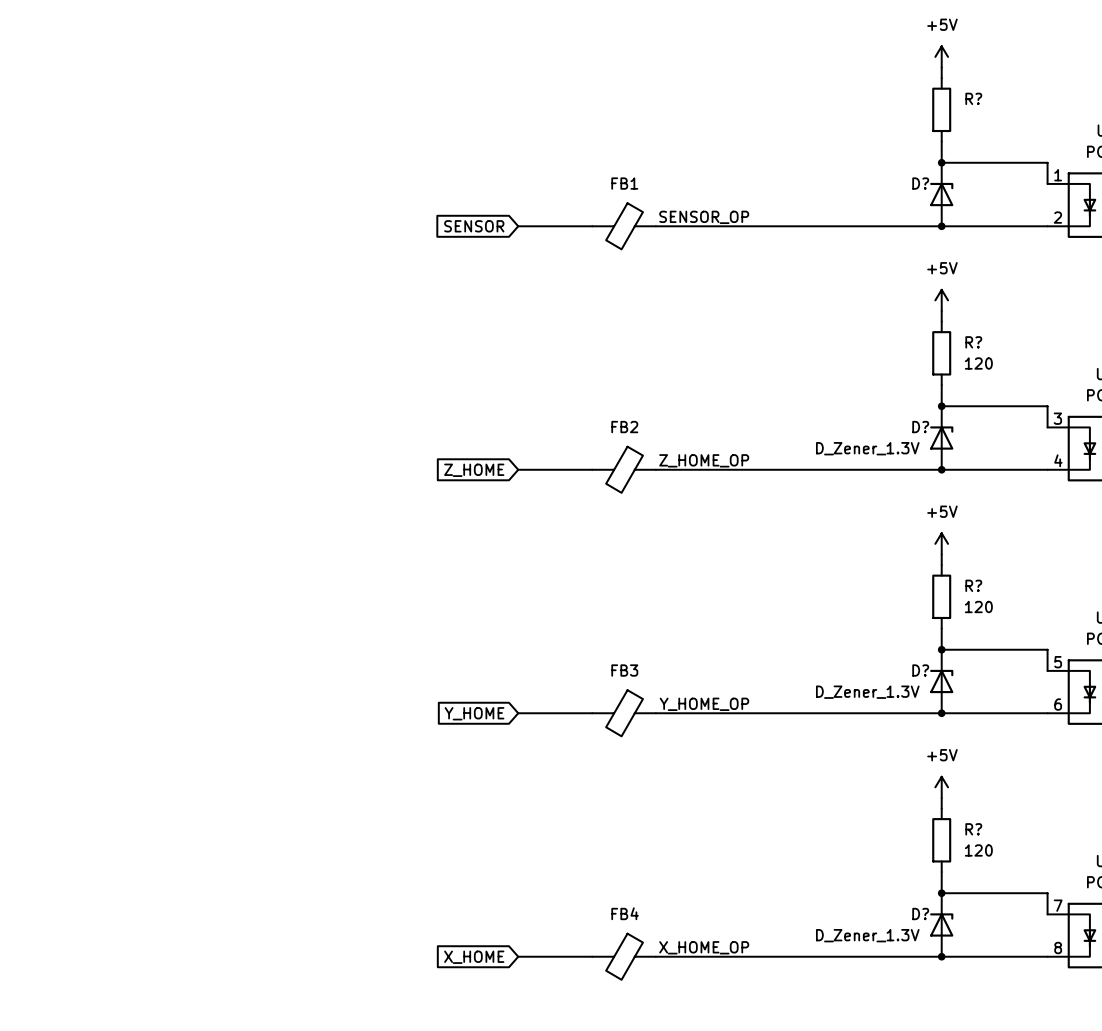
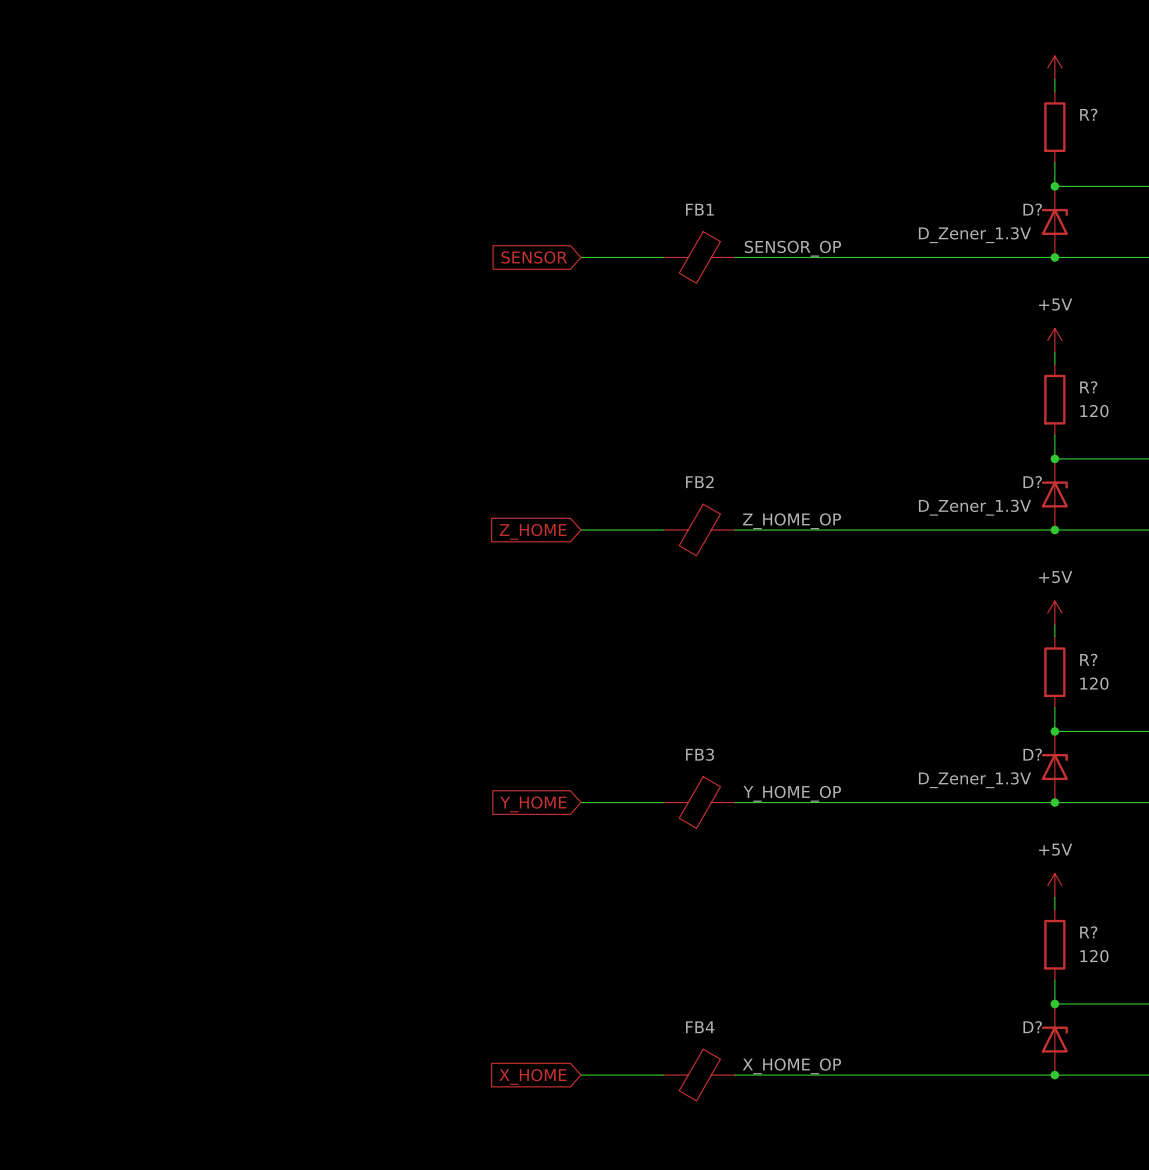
power symbol text: +5V (942, 24) -> none
D? value: none -> D_Zener_1.3V (974, 235)
D? value: D_Zener_1.3V (867, 935) -> none

